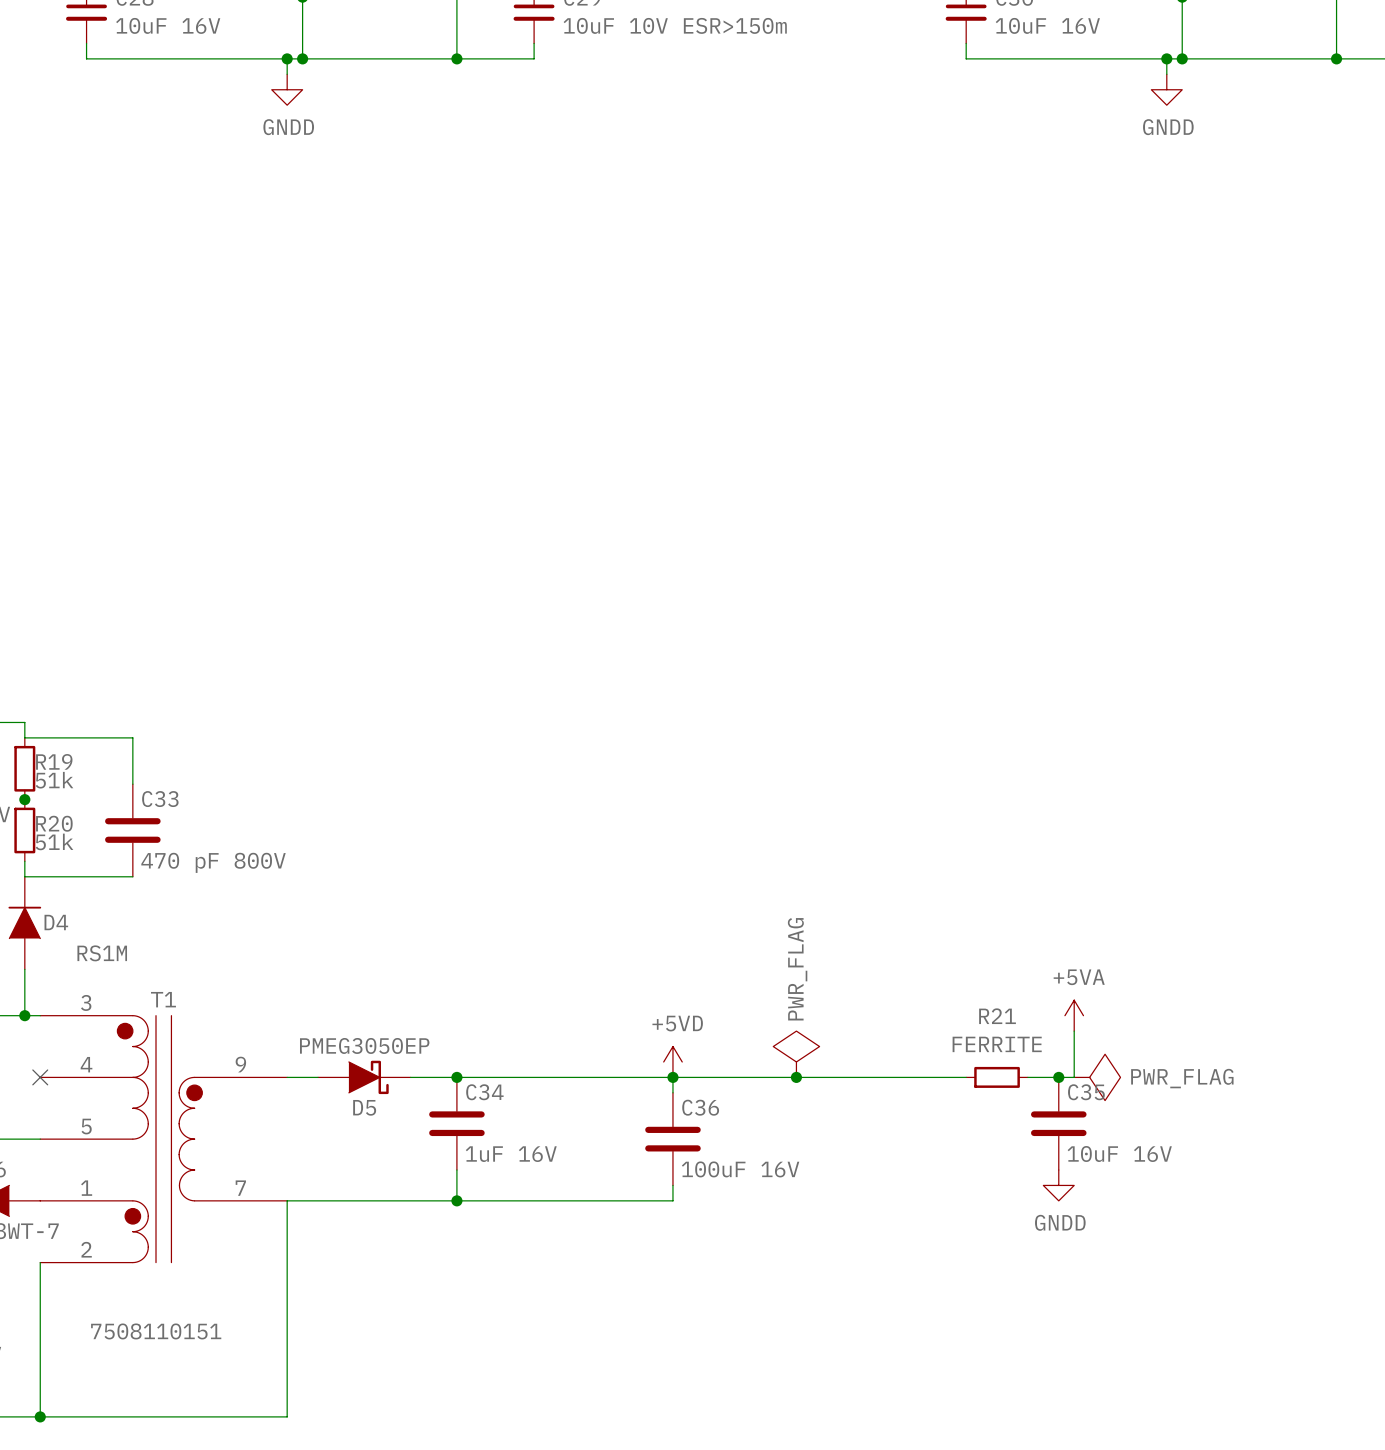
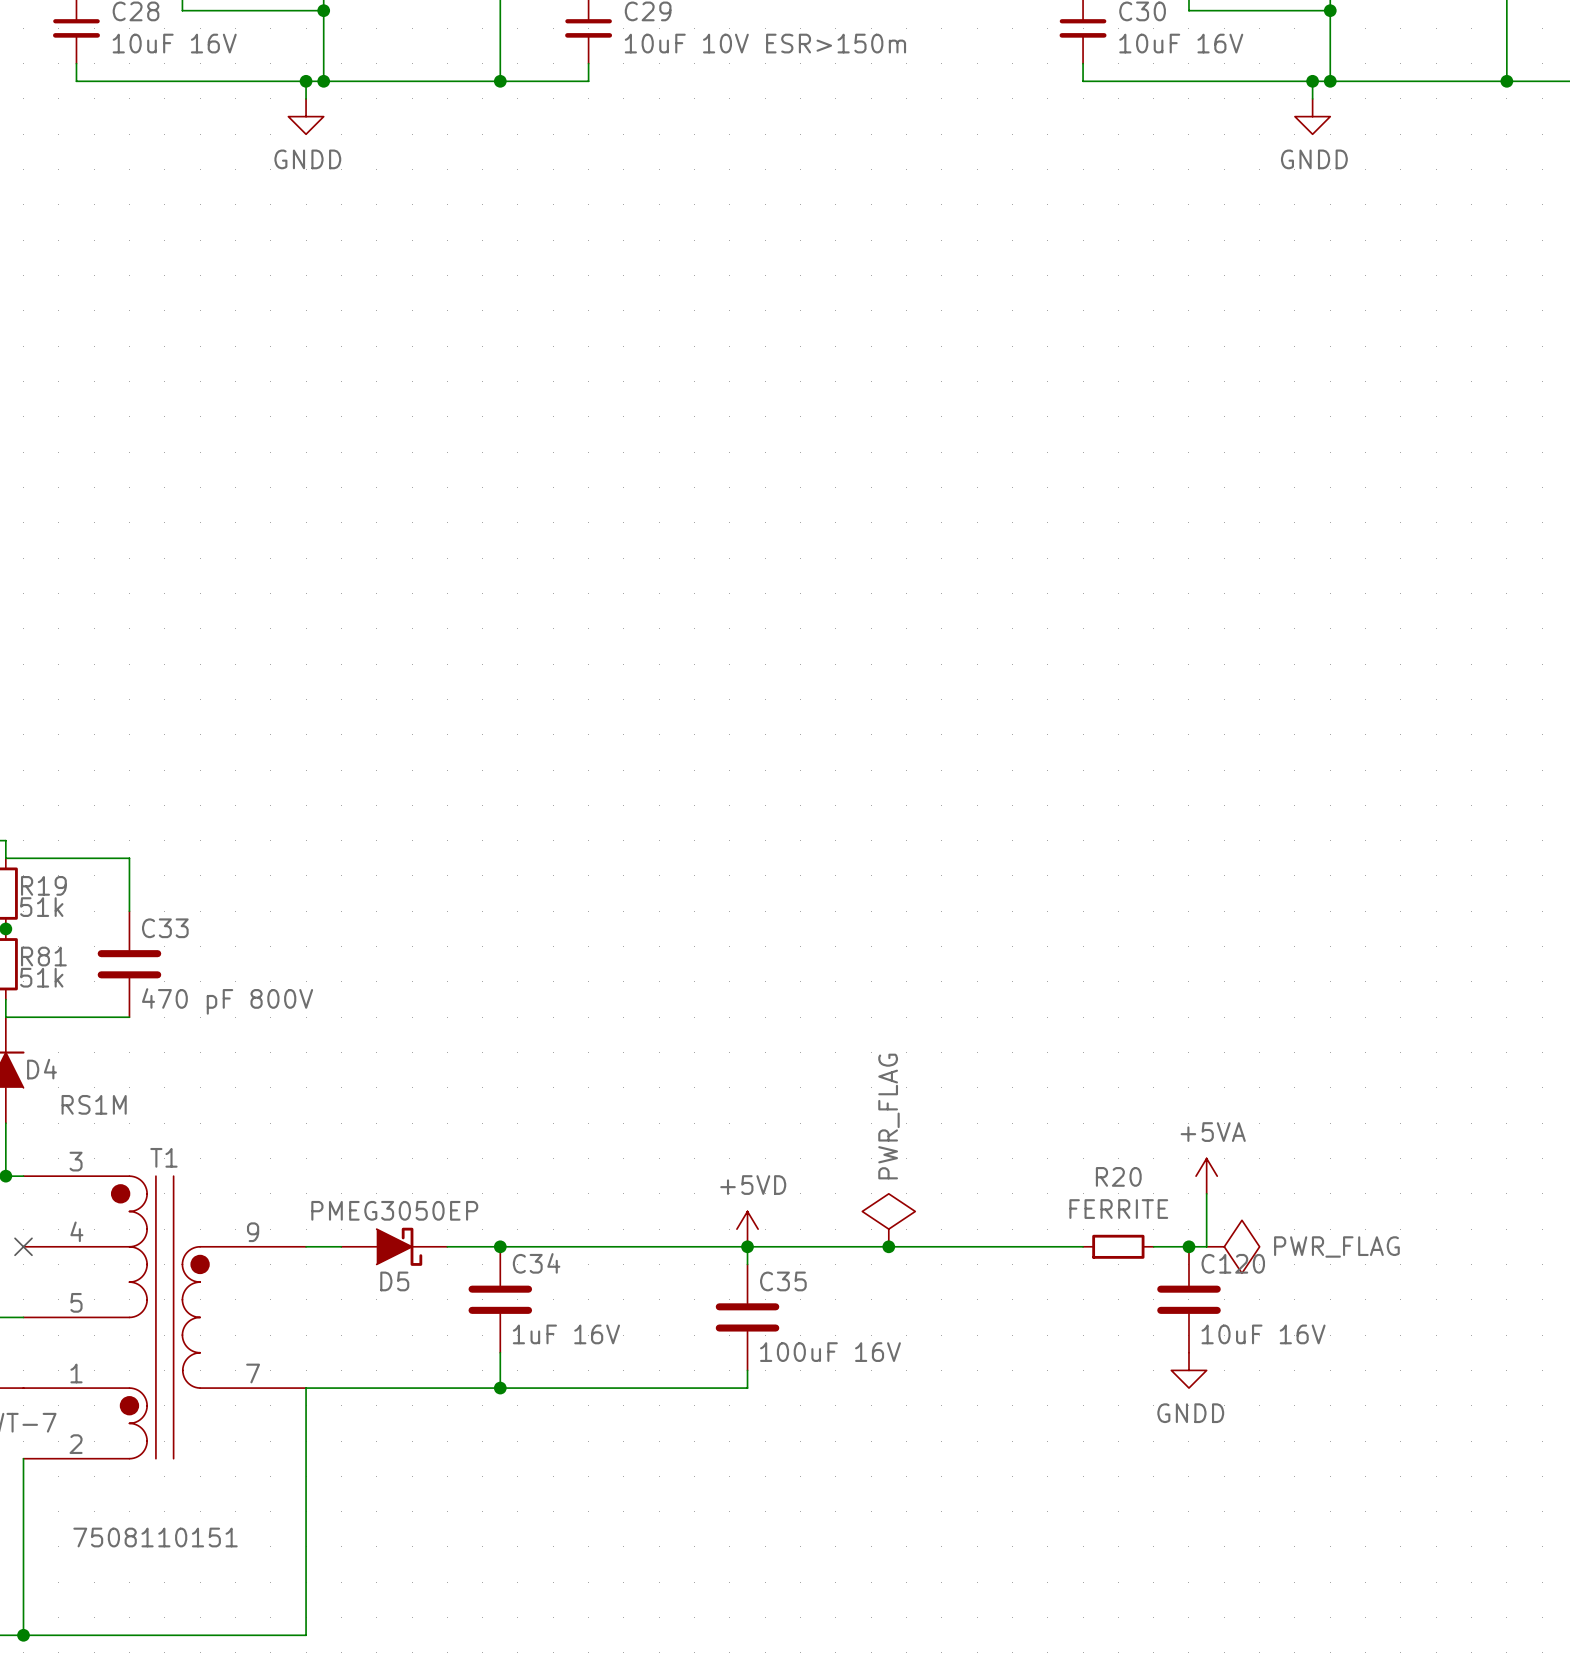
R20 name: R20 (54, 823) -> R81 (43, 956)
R21 name: R21 (997, 1016) -> R20 (1118, 1176)
C35 name: C35 (1086, 1092) -> C120 (1233, 1263)
C36 name: C36 (700, 1107) -> C35 (783, 1281)

